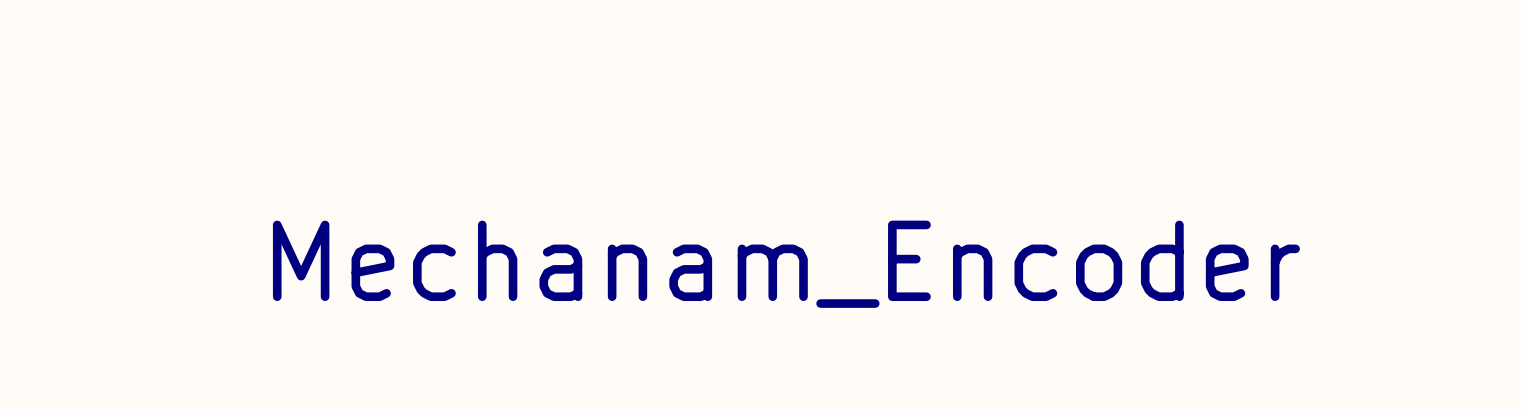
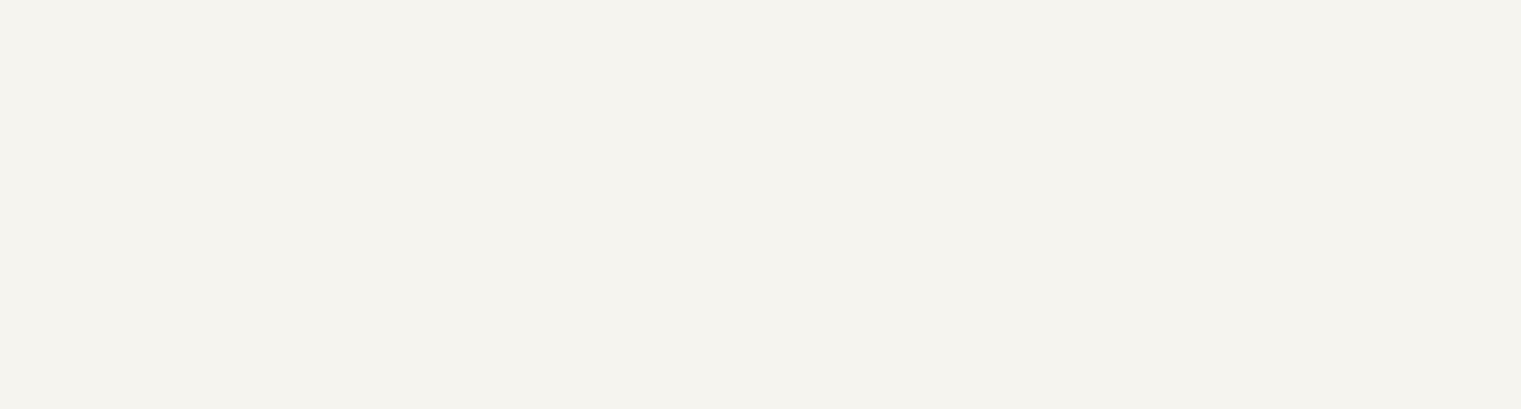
text: Mechanam_Encoder (786, 264) -> none

